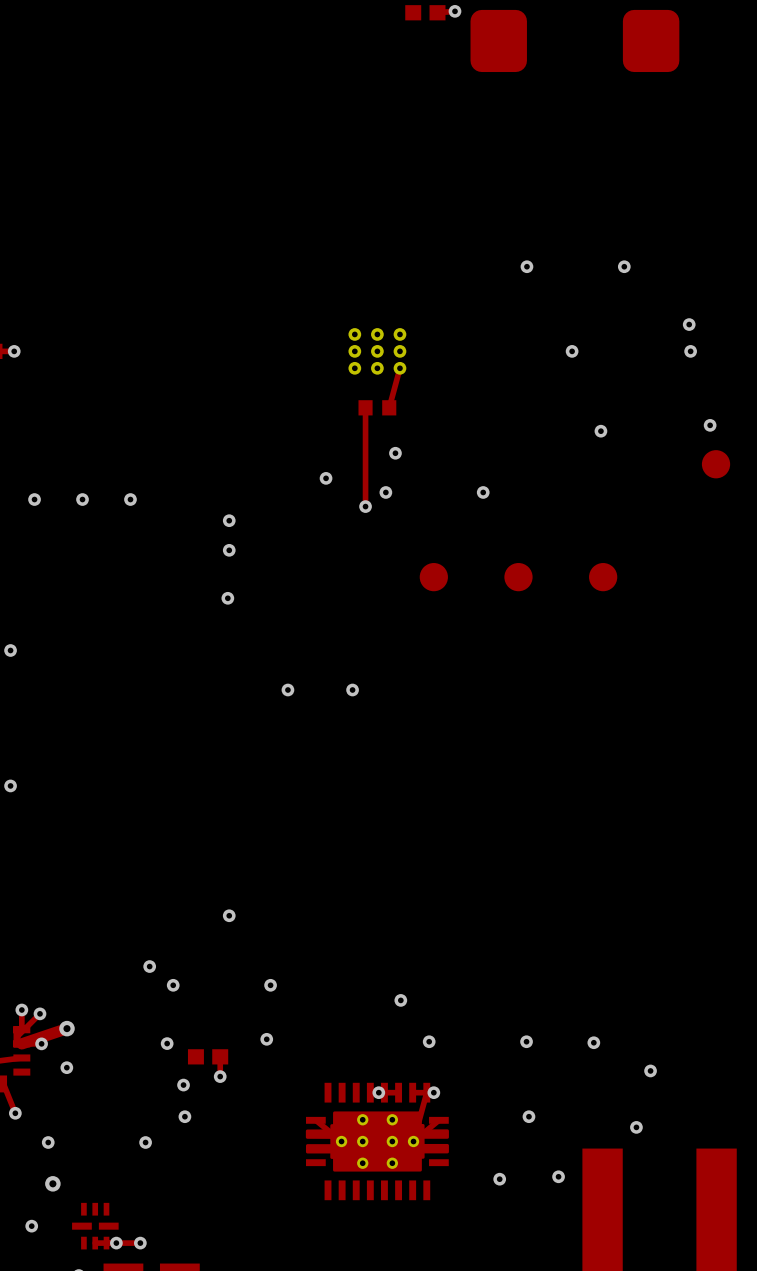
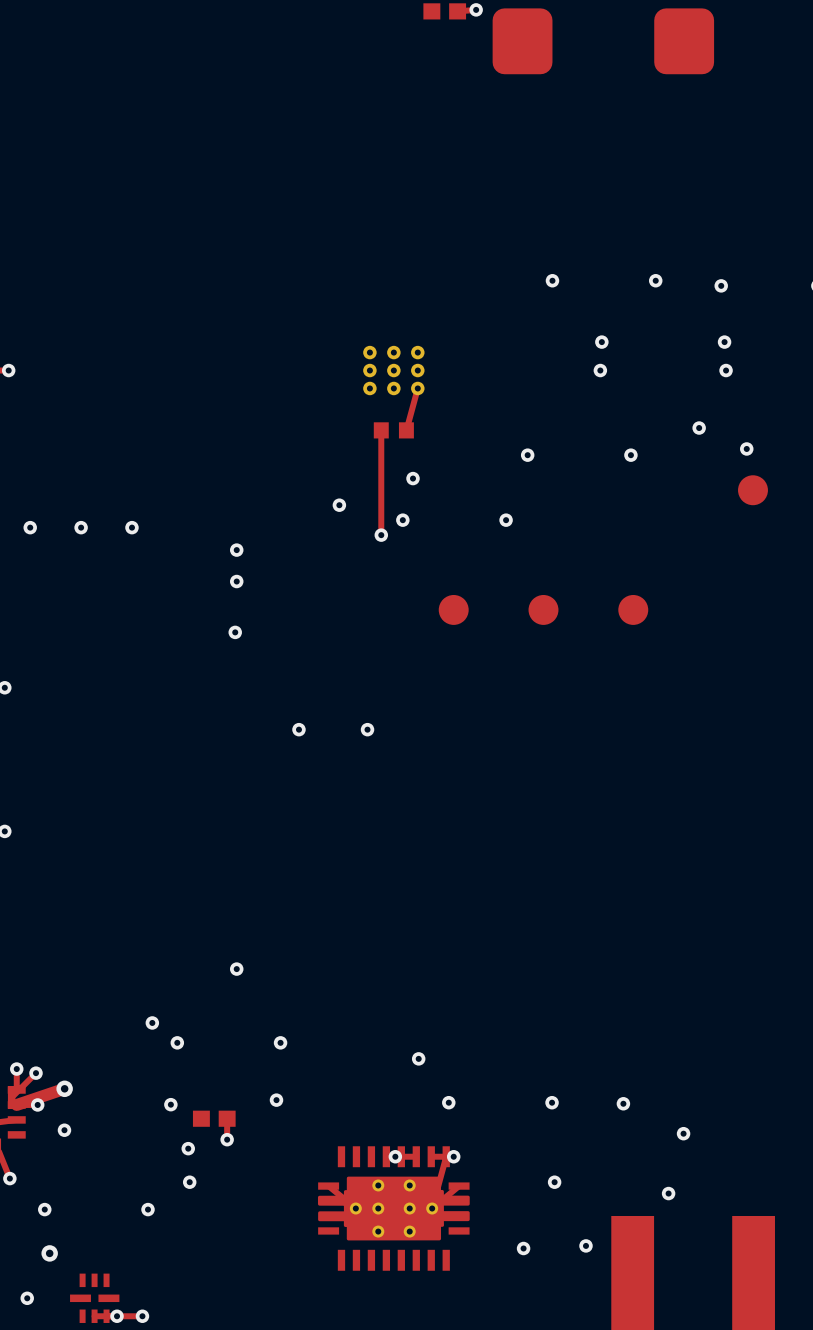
via: none -> (721, 285)
via: none -> (601, 342)
via: none -> (699, 428)
via: none -> (527, 455)

